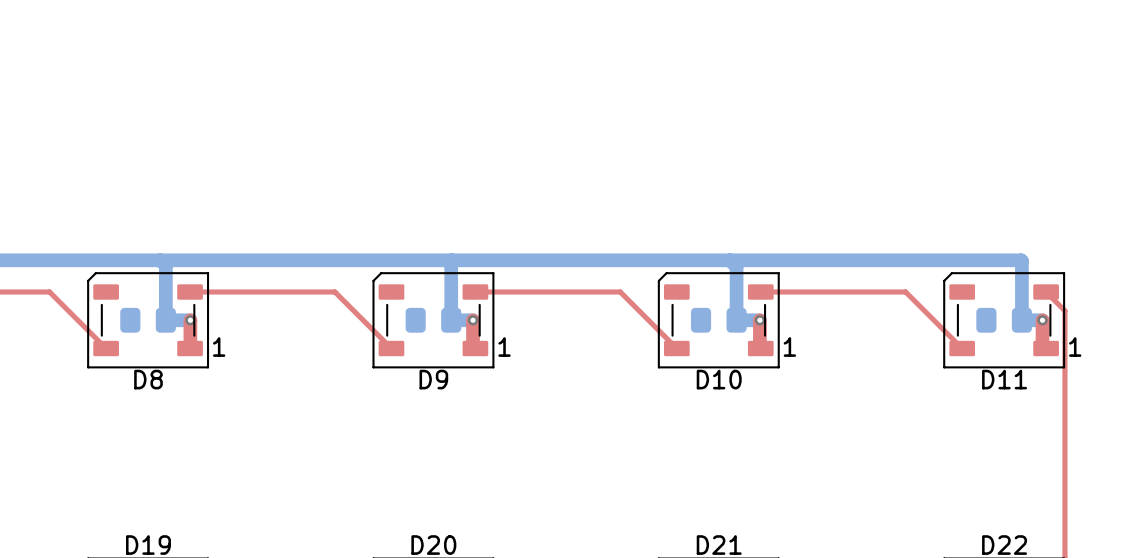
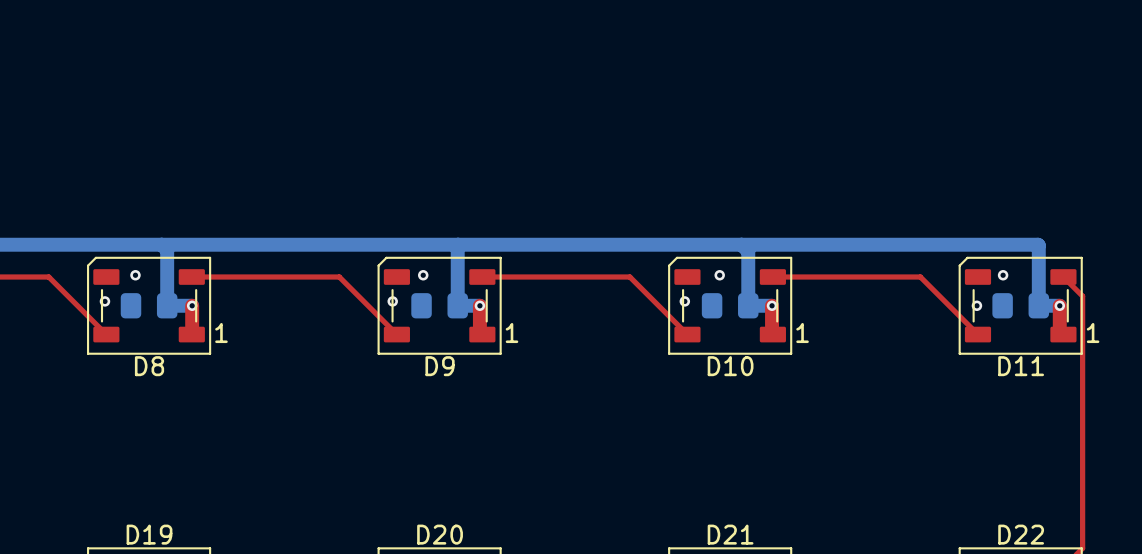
via: none -> (135, 275)
via: none -> (423, 275)
via: none -> (719, 275)
via: none -> (1003, 275)
via: none -> (104, 301)
via: none -> (392, 301)
via: none -> (684, 301)
via: none -> (976, 305)

